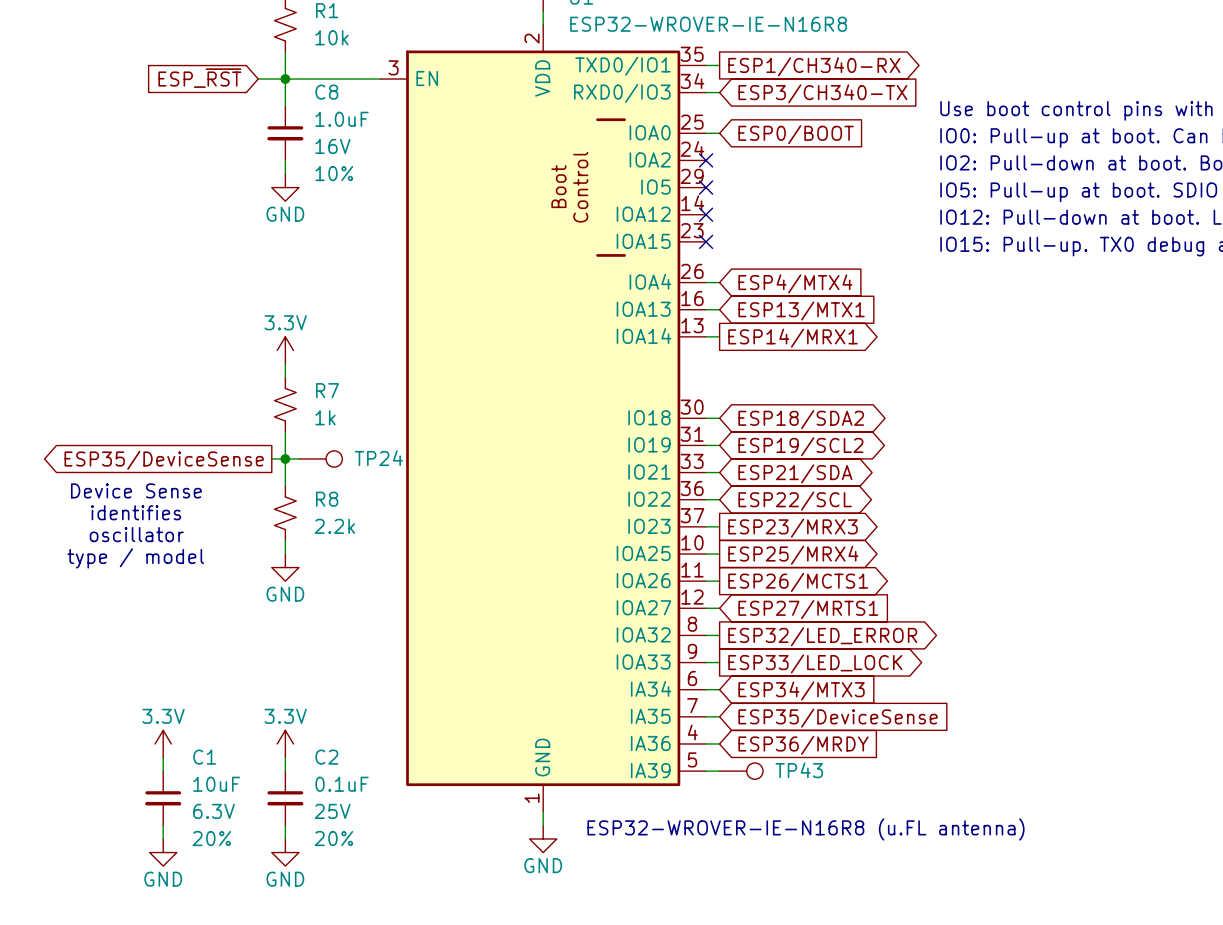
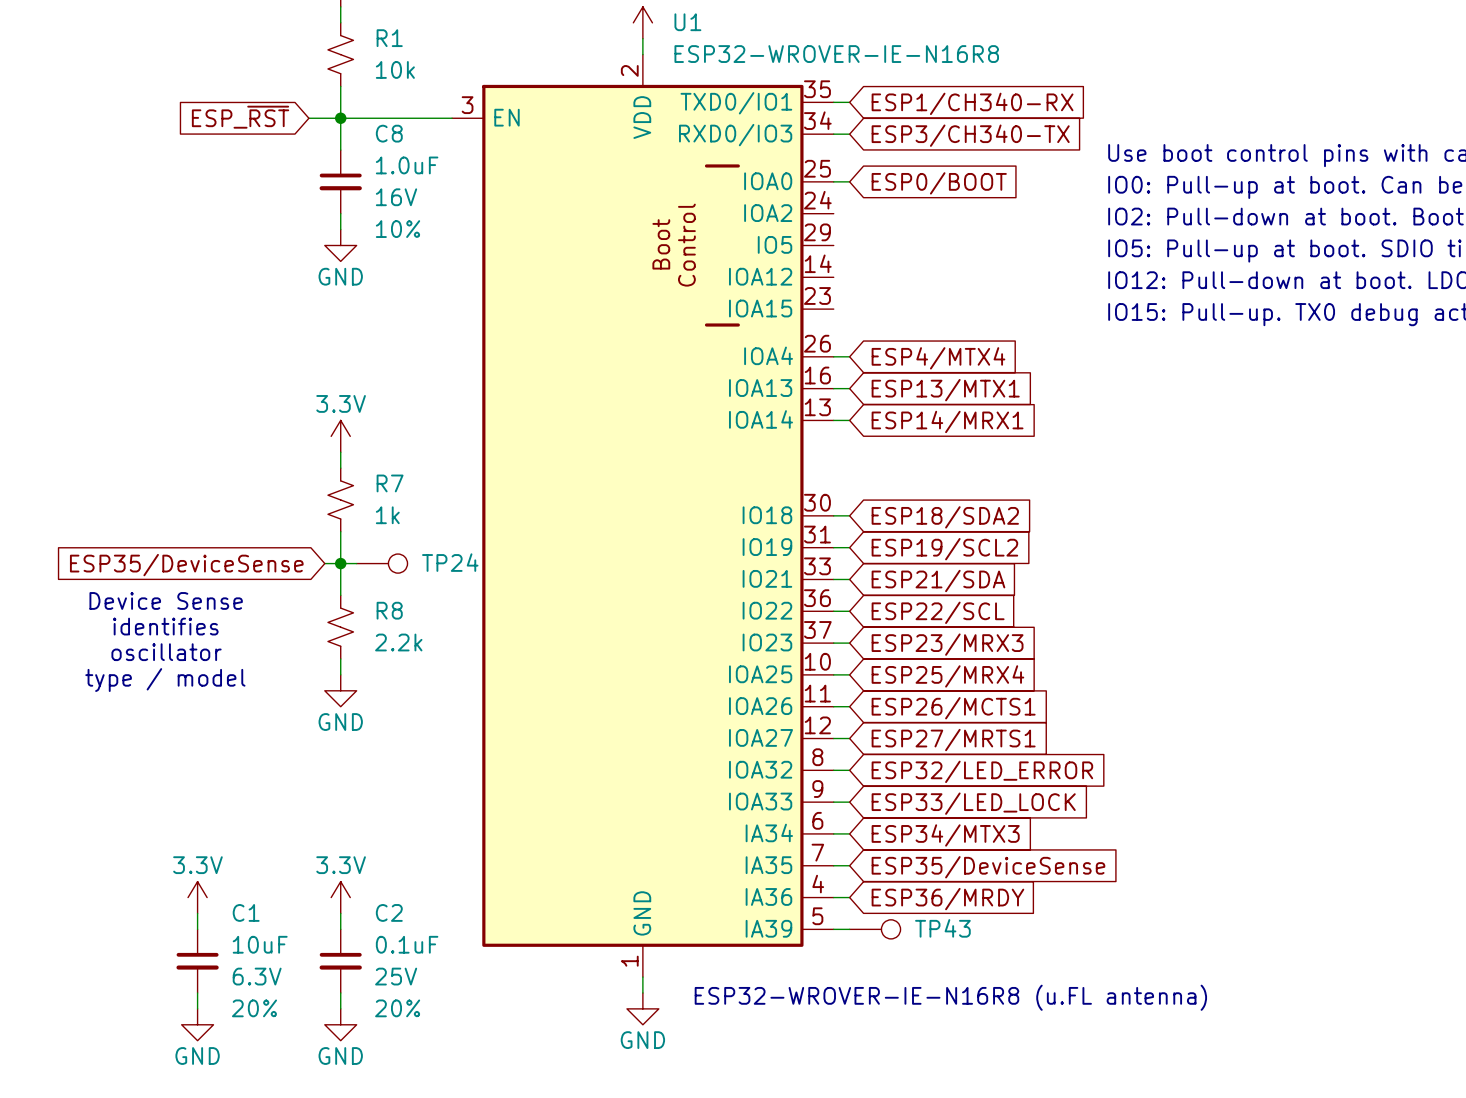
global label shape: output (814, 66) -> input (972, 103)
no-connect mark: (706, 160) -> none
no-connect mark: (706, 187) -> none
no-connect mark: (706, 214) -> none
no-connect mark: (706, 241) -> none
global label shape: output (792, 338) -> input (947, 421)
global label shape: bidirectional (801, 419) -> input (945, 517)
global label shape: bidirectional (800, 446) -> input (944, 549)
global label shape: output (164, 460) -> input (186, 565)
global label shape: bidirectional (795, 473) -> input (938, 580)
global label shape: bidirectional (795, 501) -> input (938, 612)
global label shape: output (792, 528) -> input (947, 644)
global label shape: output (793, 555) -> input (947, 676)
global label shape: output (798, 582) -> input (953, 708)
global label shape: output (822, 636) -> input (982, 771)
global label shape: output (815, 663) -> input (973, 803)

